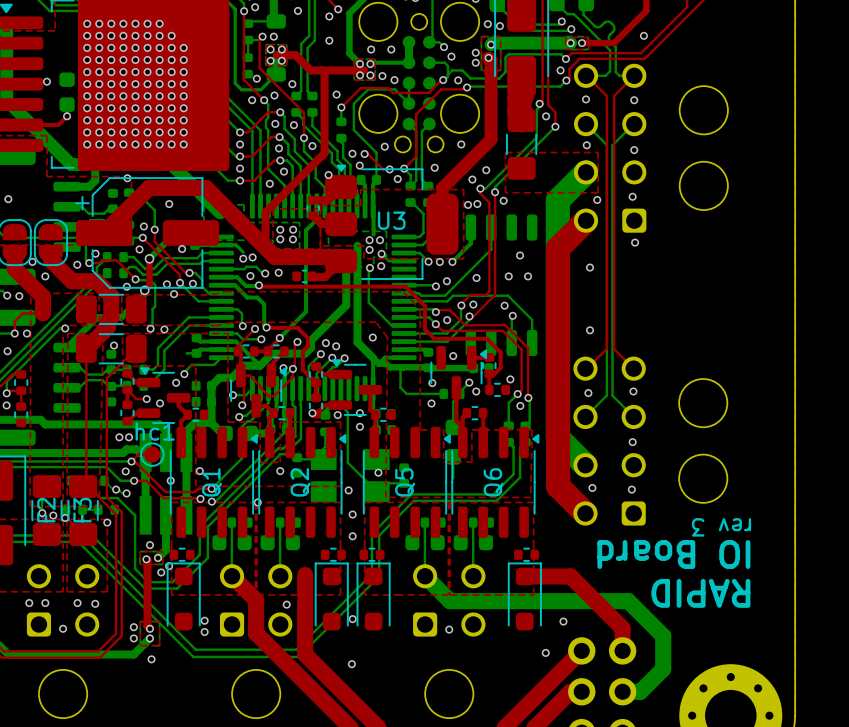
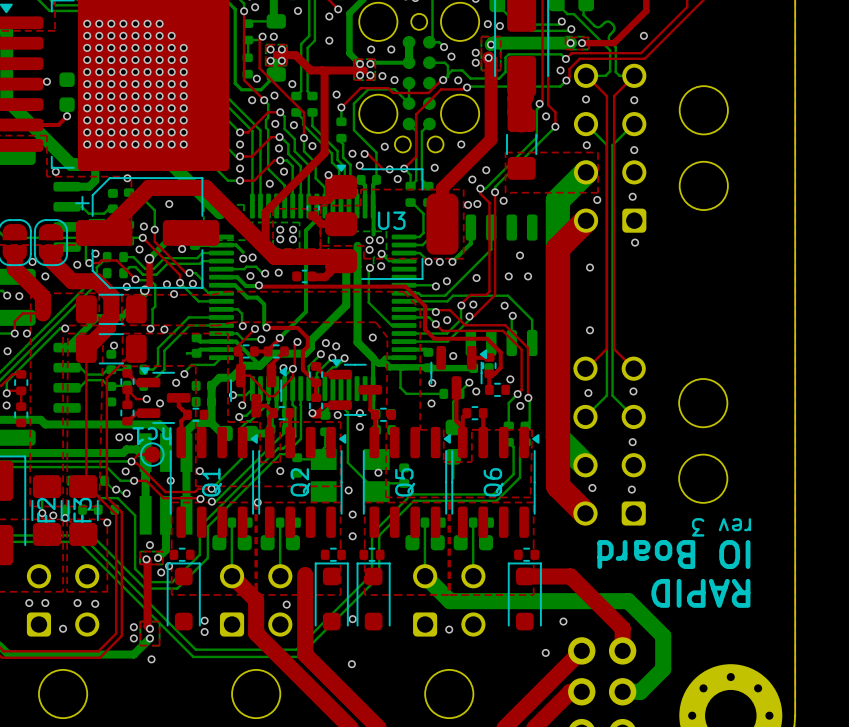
via: none -> (55, 171)
via: (8, 199) -> none
part text rotation: 0° (155, 431) -> 180° (151, 436)

